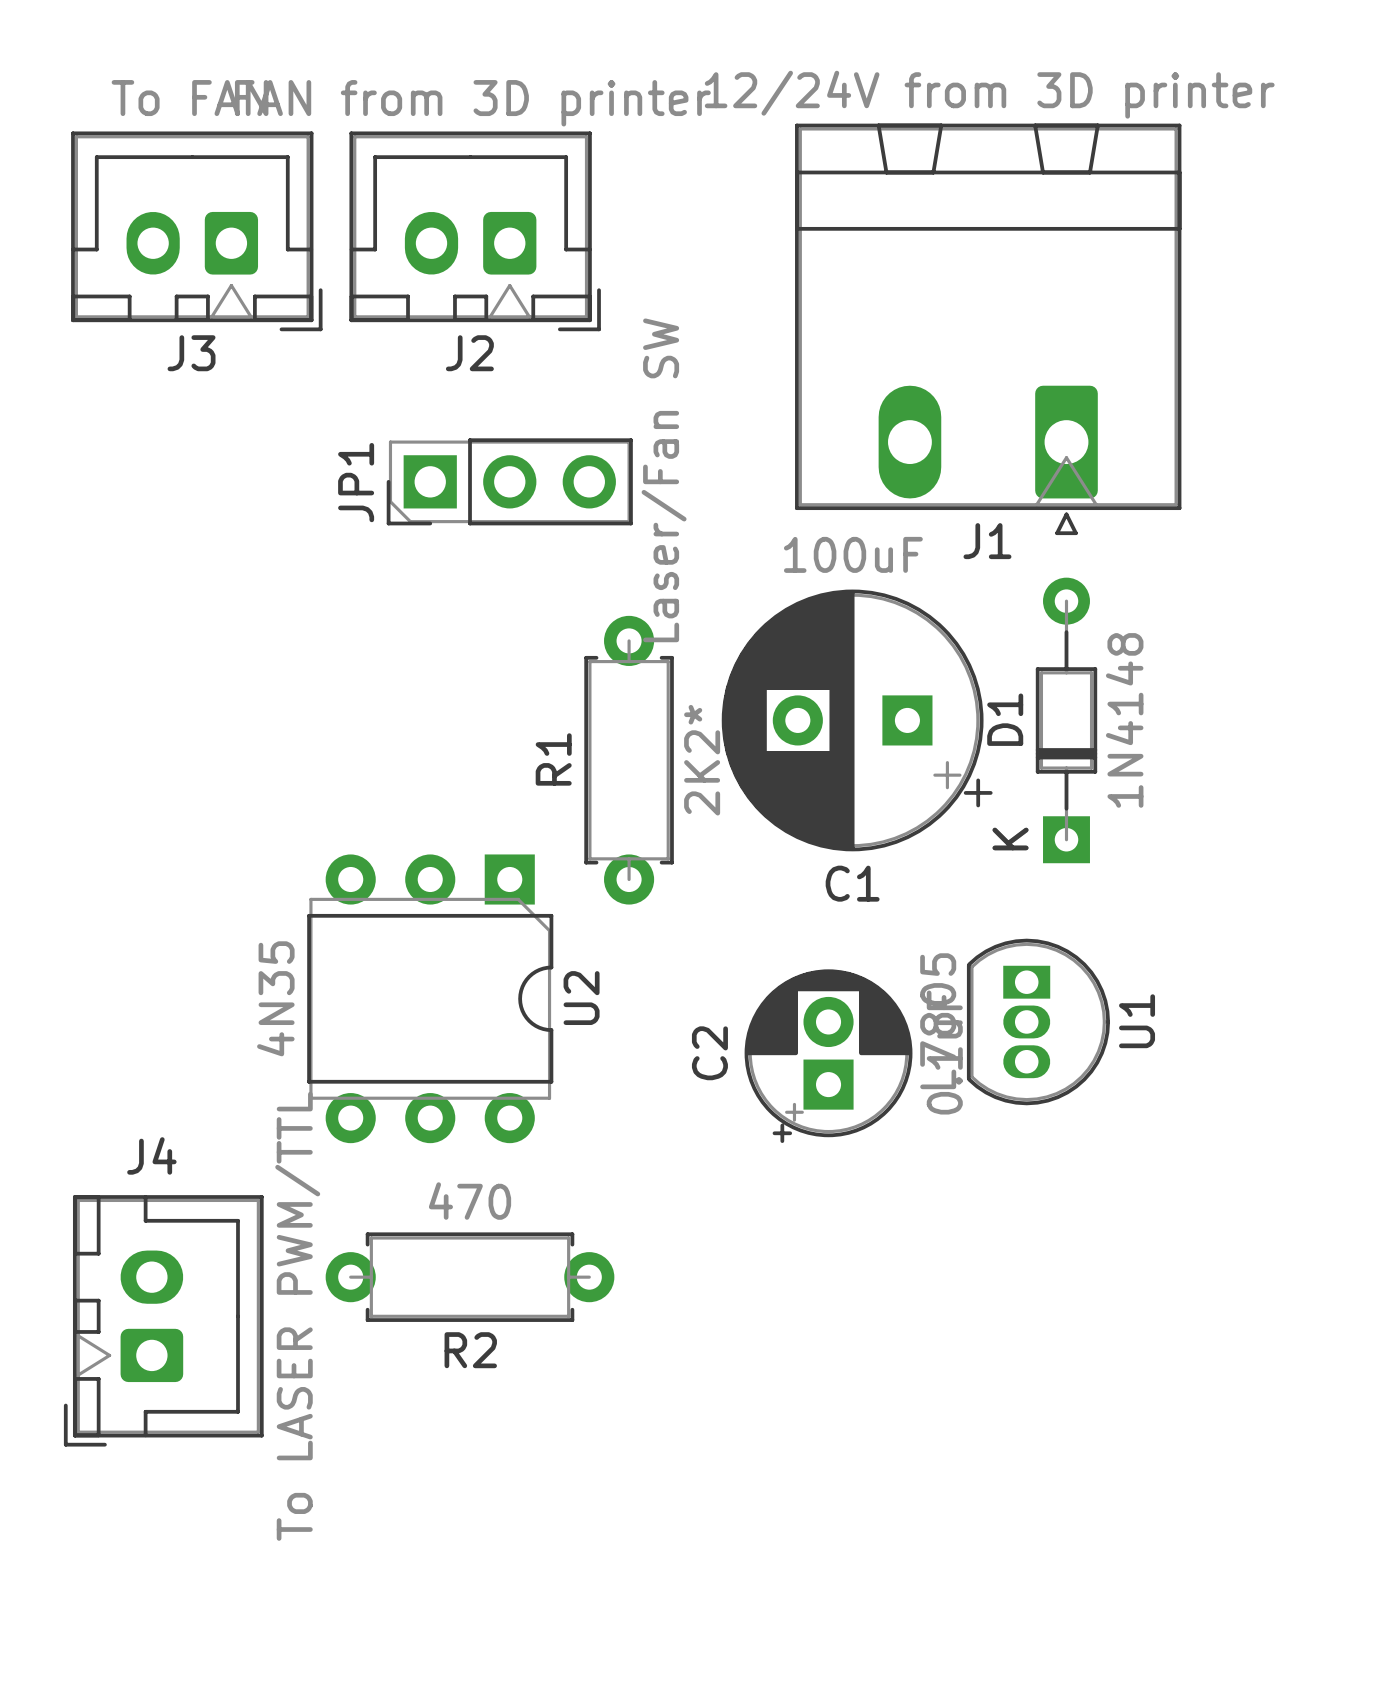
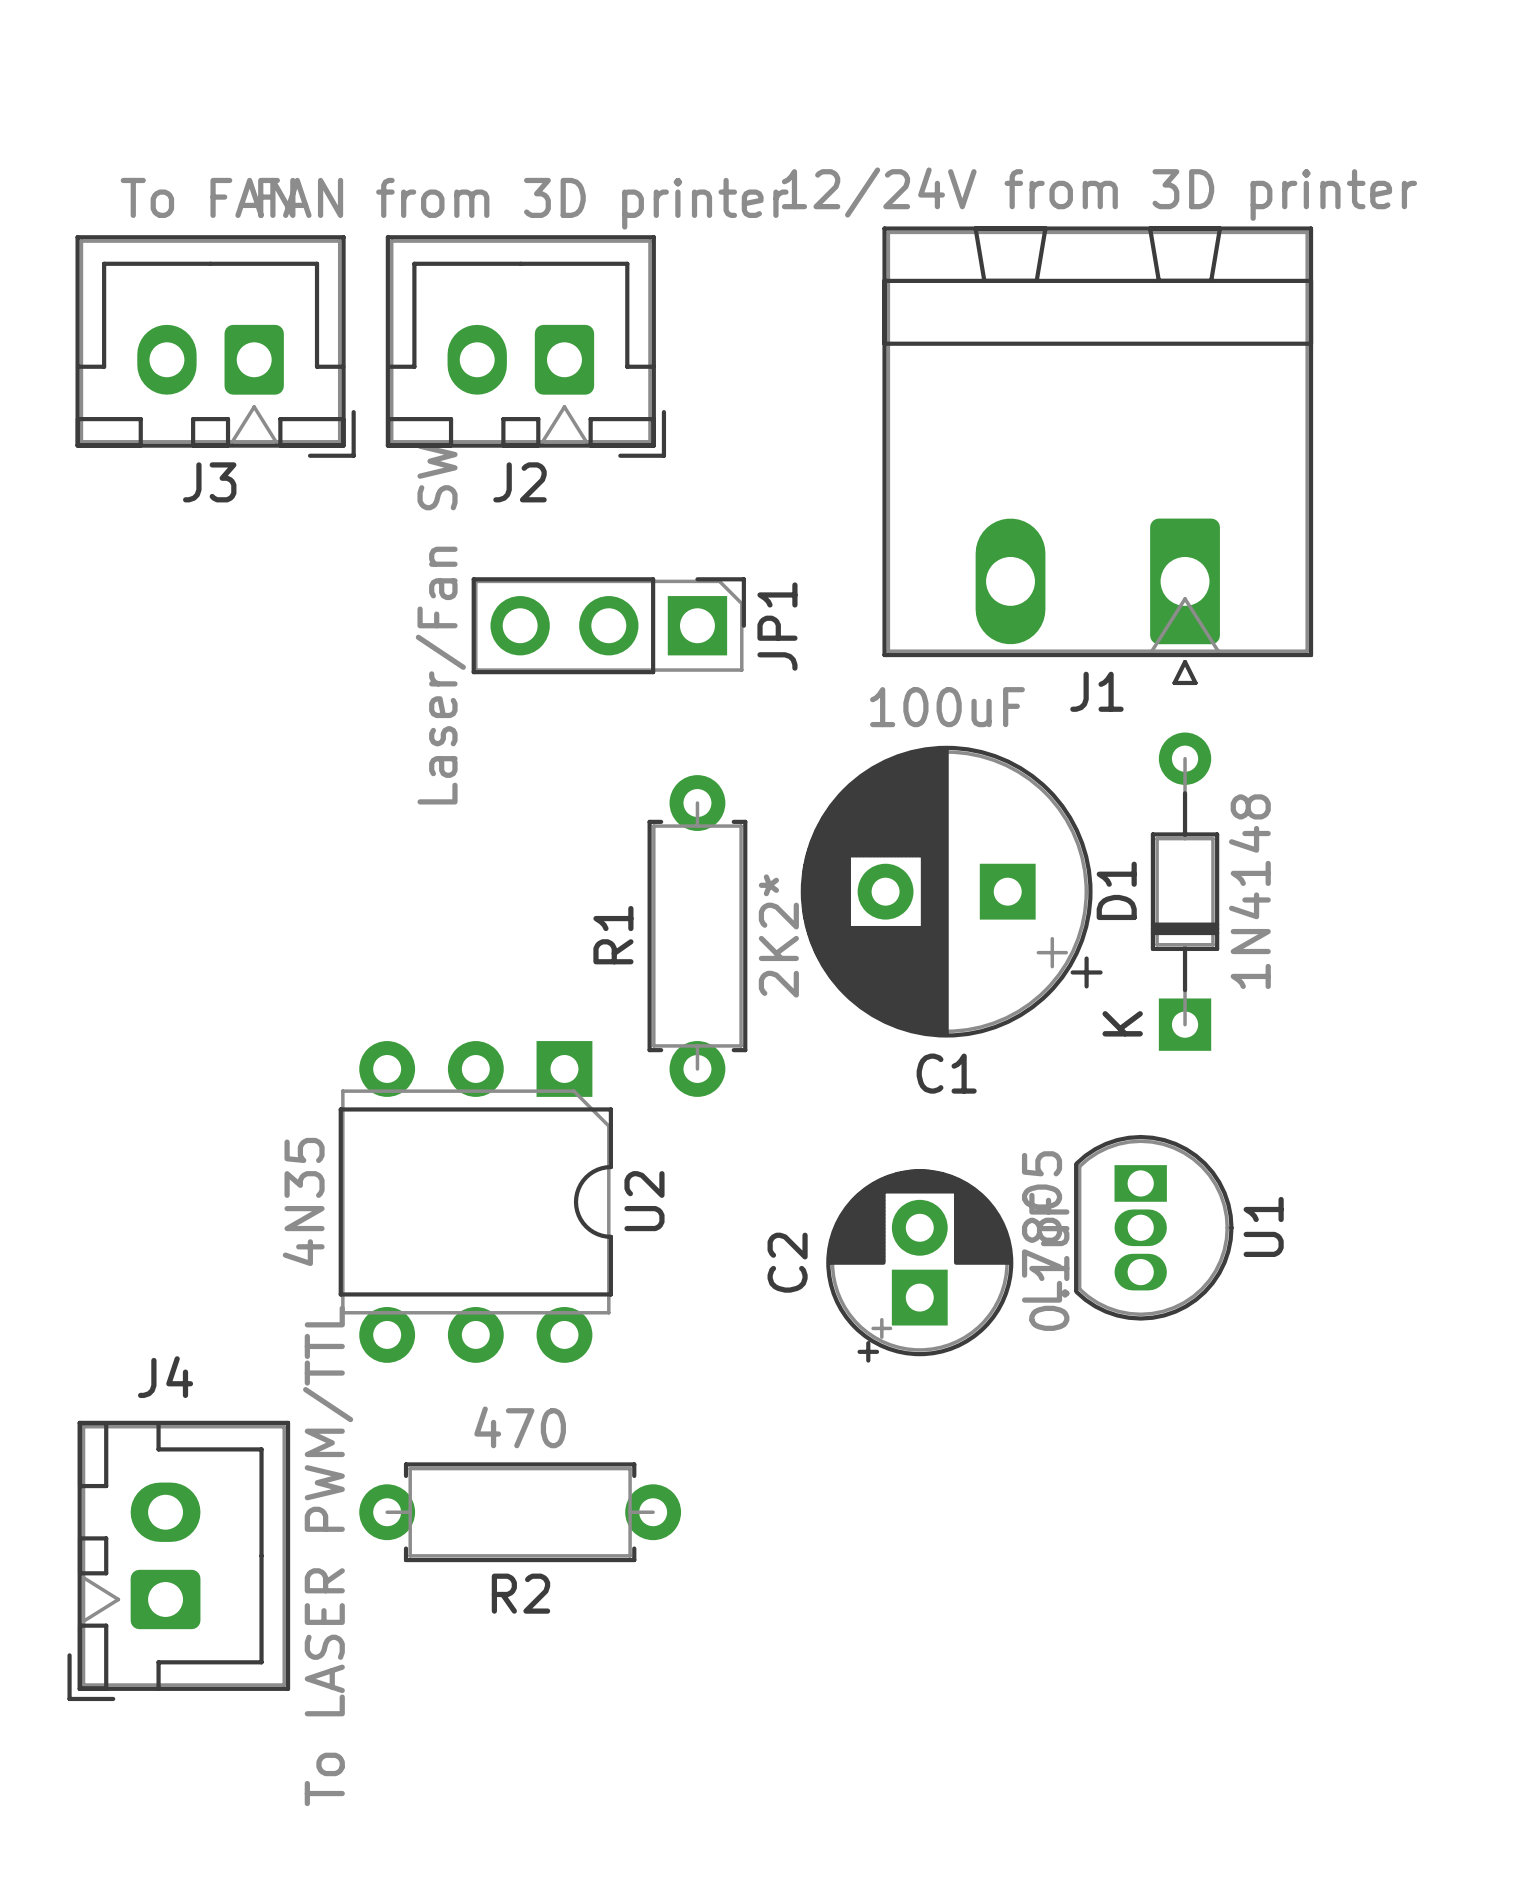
JP1 rotation: 0° (509, 481) -> 180° (608, 625)

